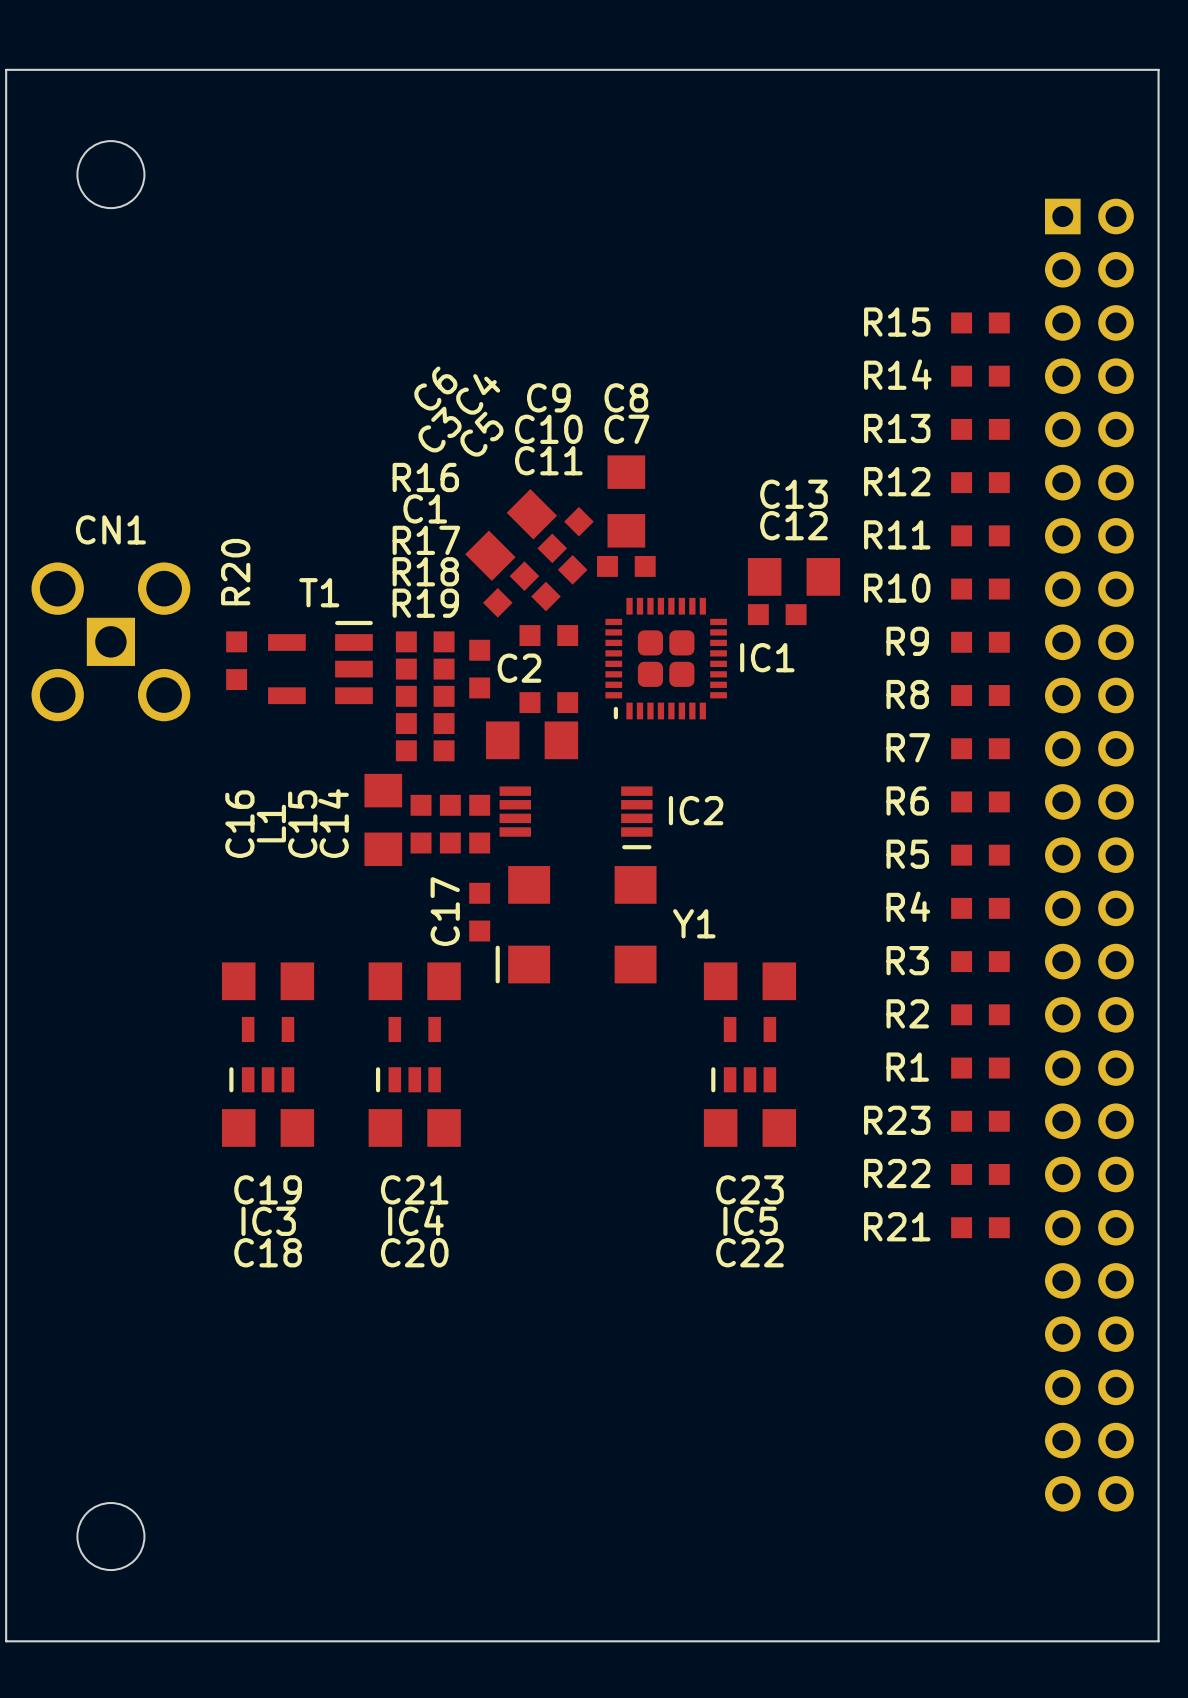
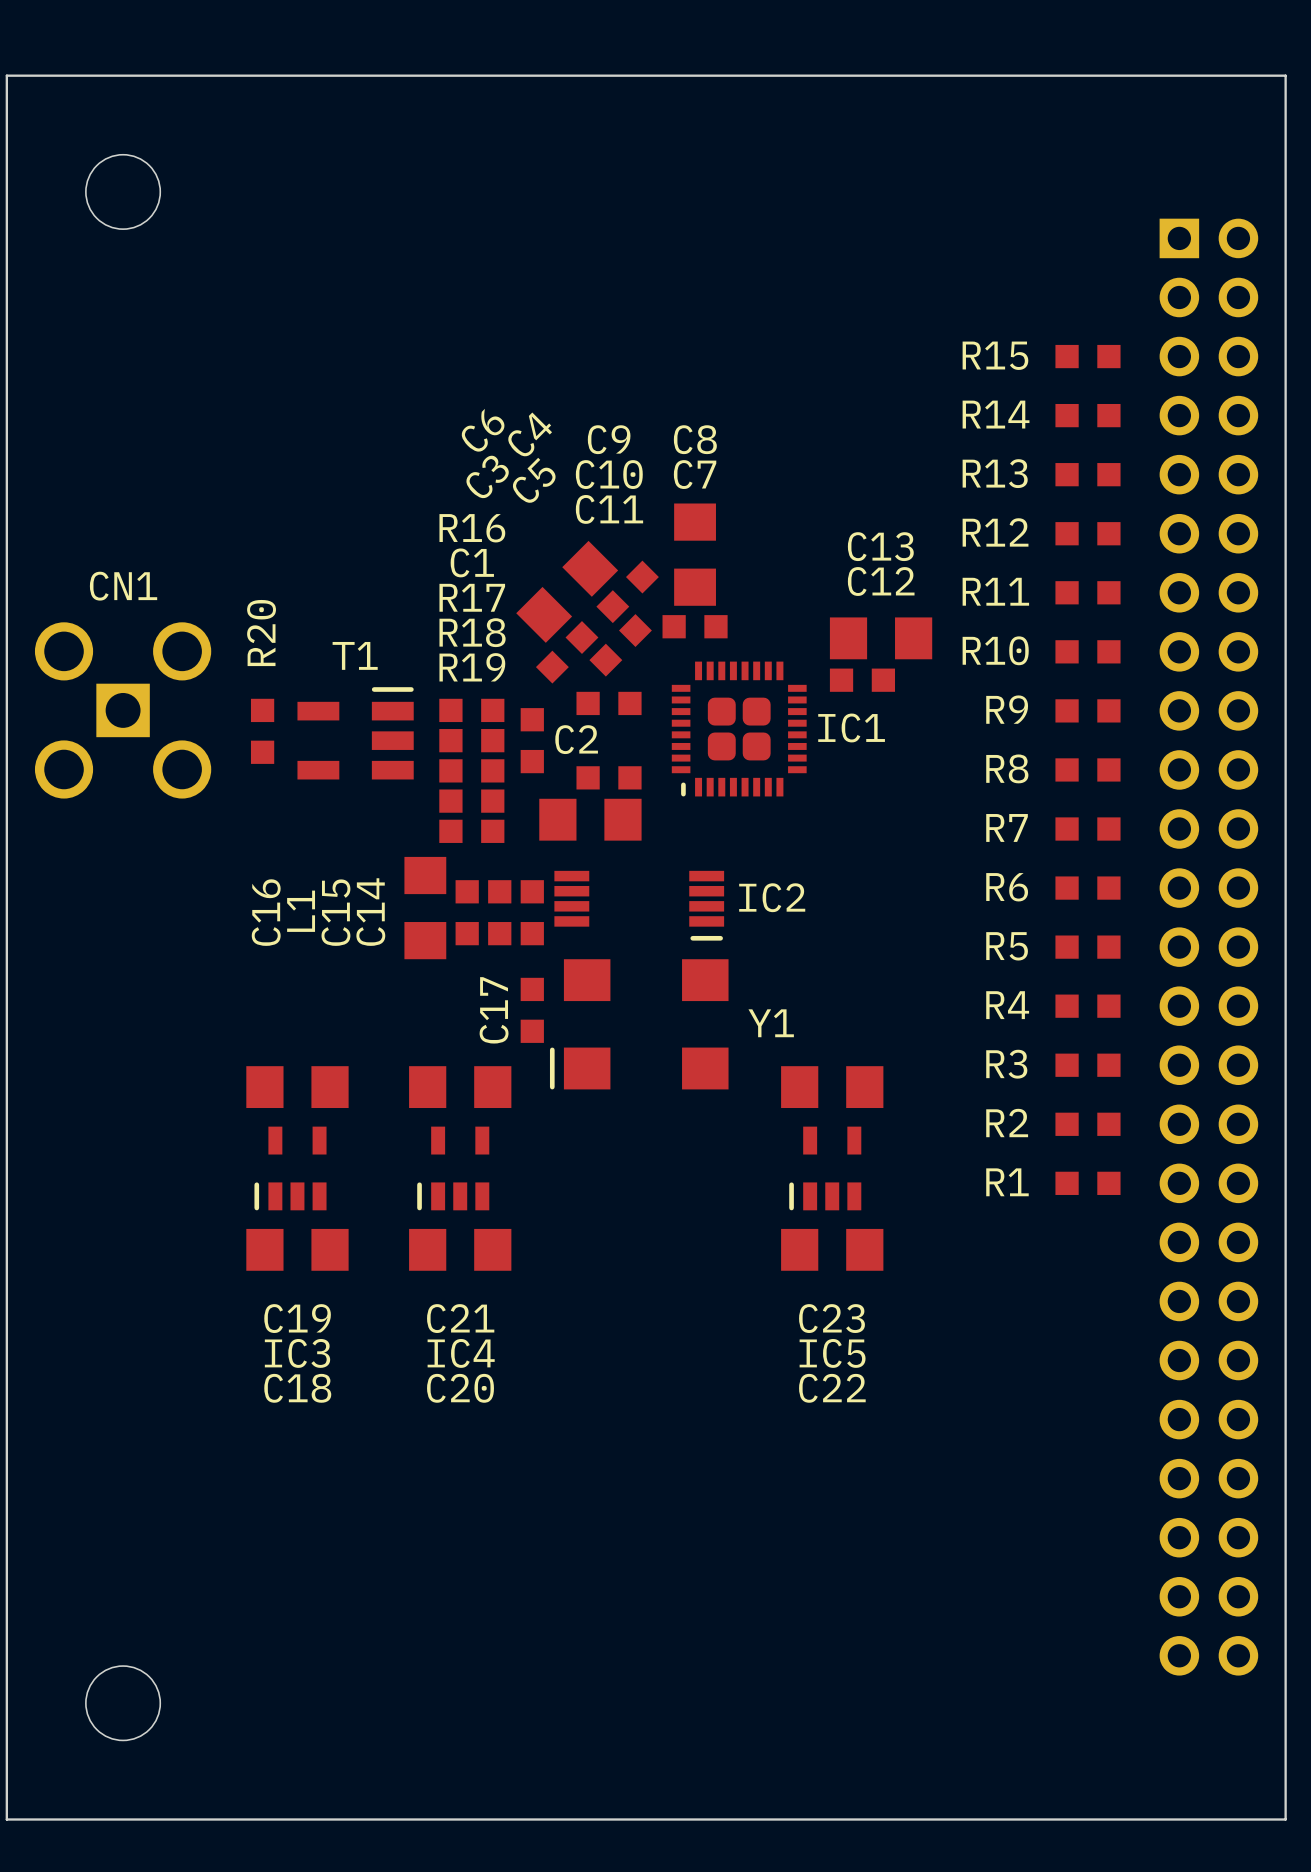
R23: (980, 1121) -> none
R22: (980, 1174) -> none
R21: (980, 1227) -> none

